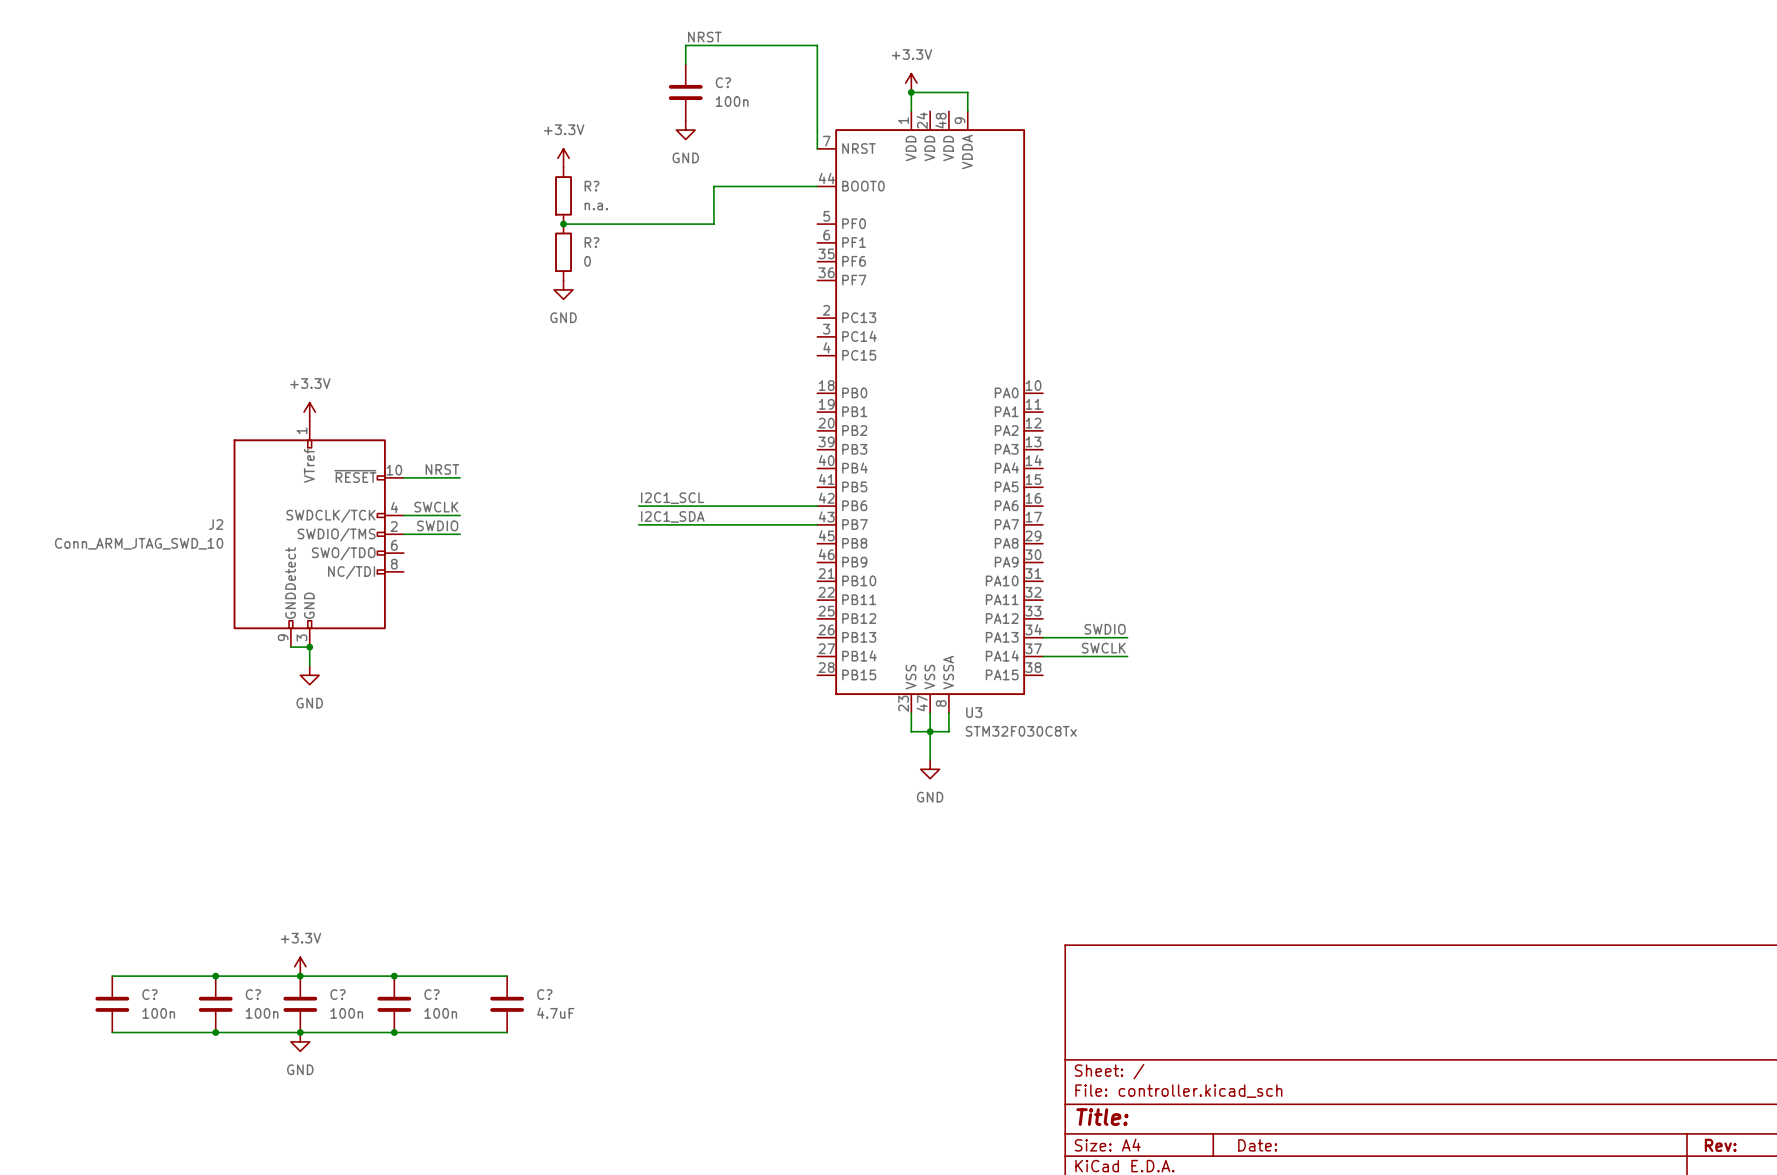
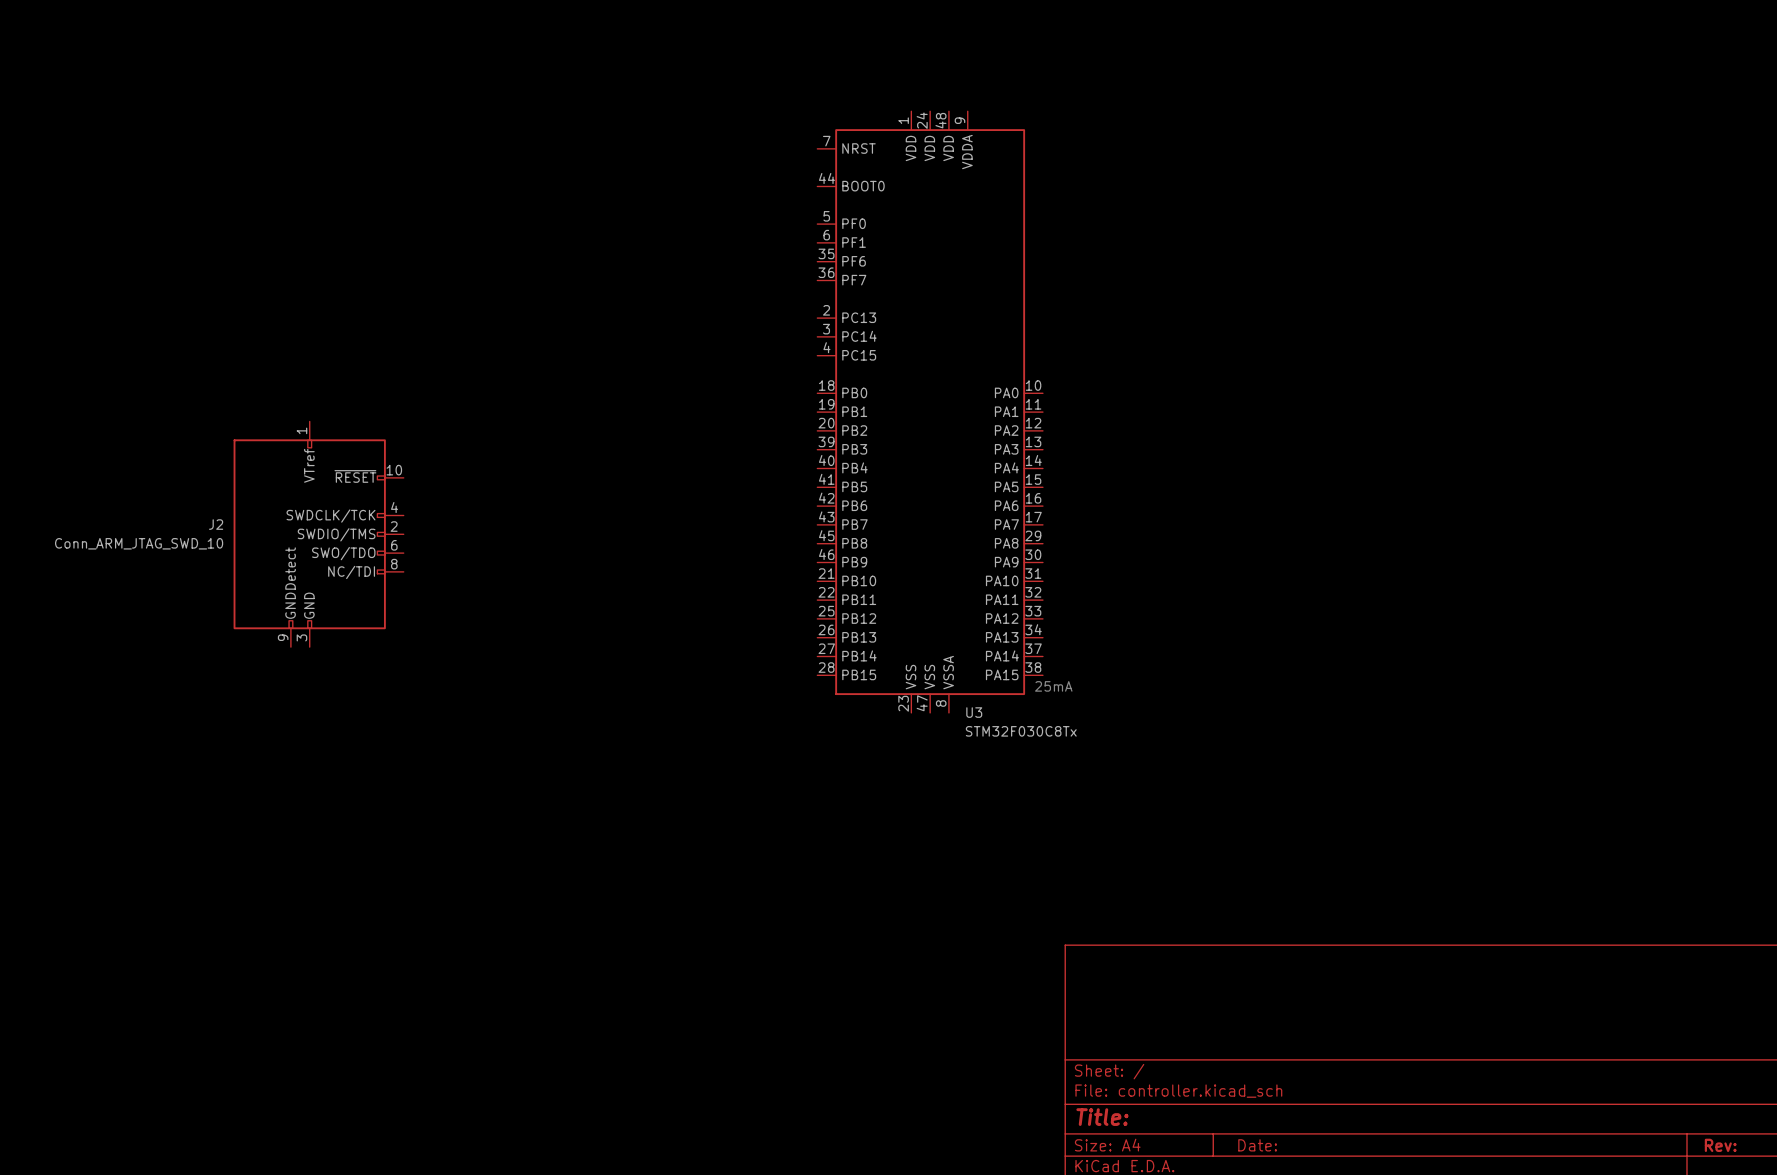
label: NRST (704, 37) -> none
wire: (685, 64) (685, 45) (817, 45) (817, 148) -> none
power symbol: +3.3V (911, 83) -> none
C?: 100n (685, 92) -> none
junction: (911, 92) -> none
wire: (911, 111) (911, 92) (967, 92) (967, 111) -> none
power symbol: GND (685, 130) -> none
power symbol: +3.3V (563, 158) -> none
wire: (817, 186) (713, 186) (713, 224) (563, 224) -> none
R?: n.a. (563, 195) -> none
junction: (563, 224) -> none
R?: 0 (563, 252) -> none
power symbol: GND (563, 289) -> none
power symbol: +3.3V (309, 412) -> none
label: NRST (442, 469) -> none
wire: (403, 477) (460, 477) -> none
label: I2C1_SCL (672, 498) -> none
wire: (638, 506) (817, 506) -> none
label: SWCLK (436, 507) -> none
wire: (403, 515) (460, 515) -> none
label: I2C1_SDA (672, 516) -> none
wire: (638, 524) (817, 524) -> none
label: SWDIO (437, 525) -> none
wire: (403, 534) (460, 534) -> none
label: SWDIO (1105, 629) -> none
wire: (1042, 637) (1127, 637) -> none
wire: (290, 647) (309, 647) (309, 665) -> none
junction: (309, 647) -> none
label: SWCLK (1103, 648) -> none
wire: (1042, 656) (1127, 656) -> none
power symbol: GND (309, 675) -> none
text: none -> 25mA (1053, 686)
wire: (911, 712) (911, 731) (948, 731) (948, 712) -> none
wire: (930, 712) (930, 759) -> none
junction: (930, 731) -> none
power symbol: GND (930, 769) -> none
power symbol: +3.3V (300, 966) -> none
wire: (112, 976) (507, 976) -> none
junction: (215, 976) -> none
junction: (300, 976) -> none
junction: (394, 976) -> none
C?: 100n (112, 1004) -> none
C?: 100n (215, 1004) -> none
C?: 100n (300, 1004) -> none
C?: 100n (394, 1004) -> none
C?: 4.7uF (507, 1004) -> none
wire: (112, 1032) (507, 1032) -> none
junction: (215, 1032) -> none
junction: (300, 1032) -> none
junction: (394, 1032) -> none
power symbol: GND (300, 1041) -> none

